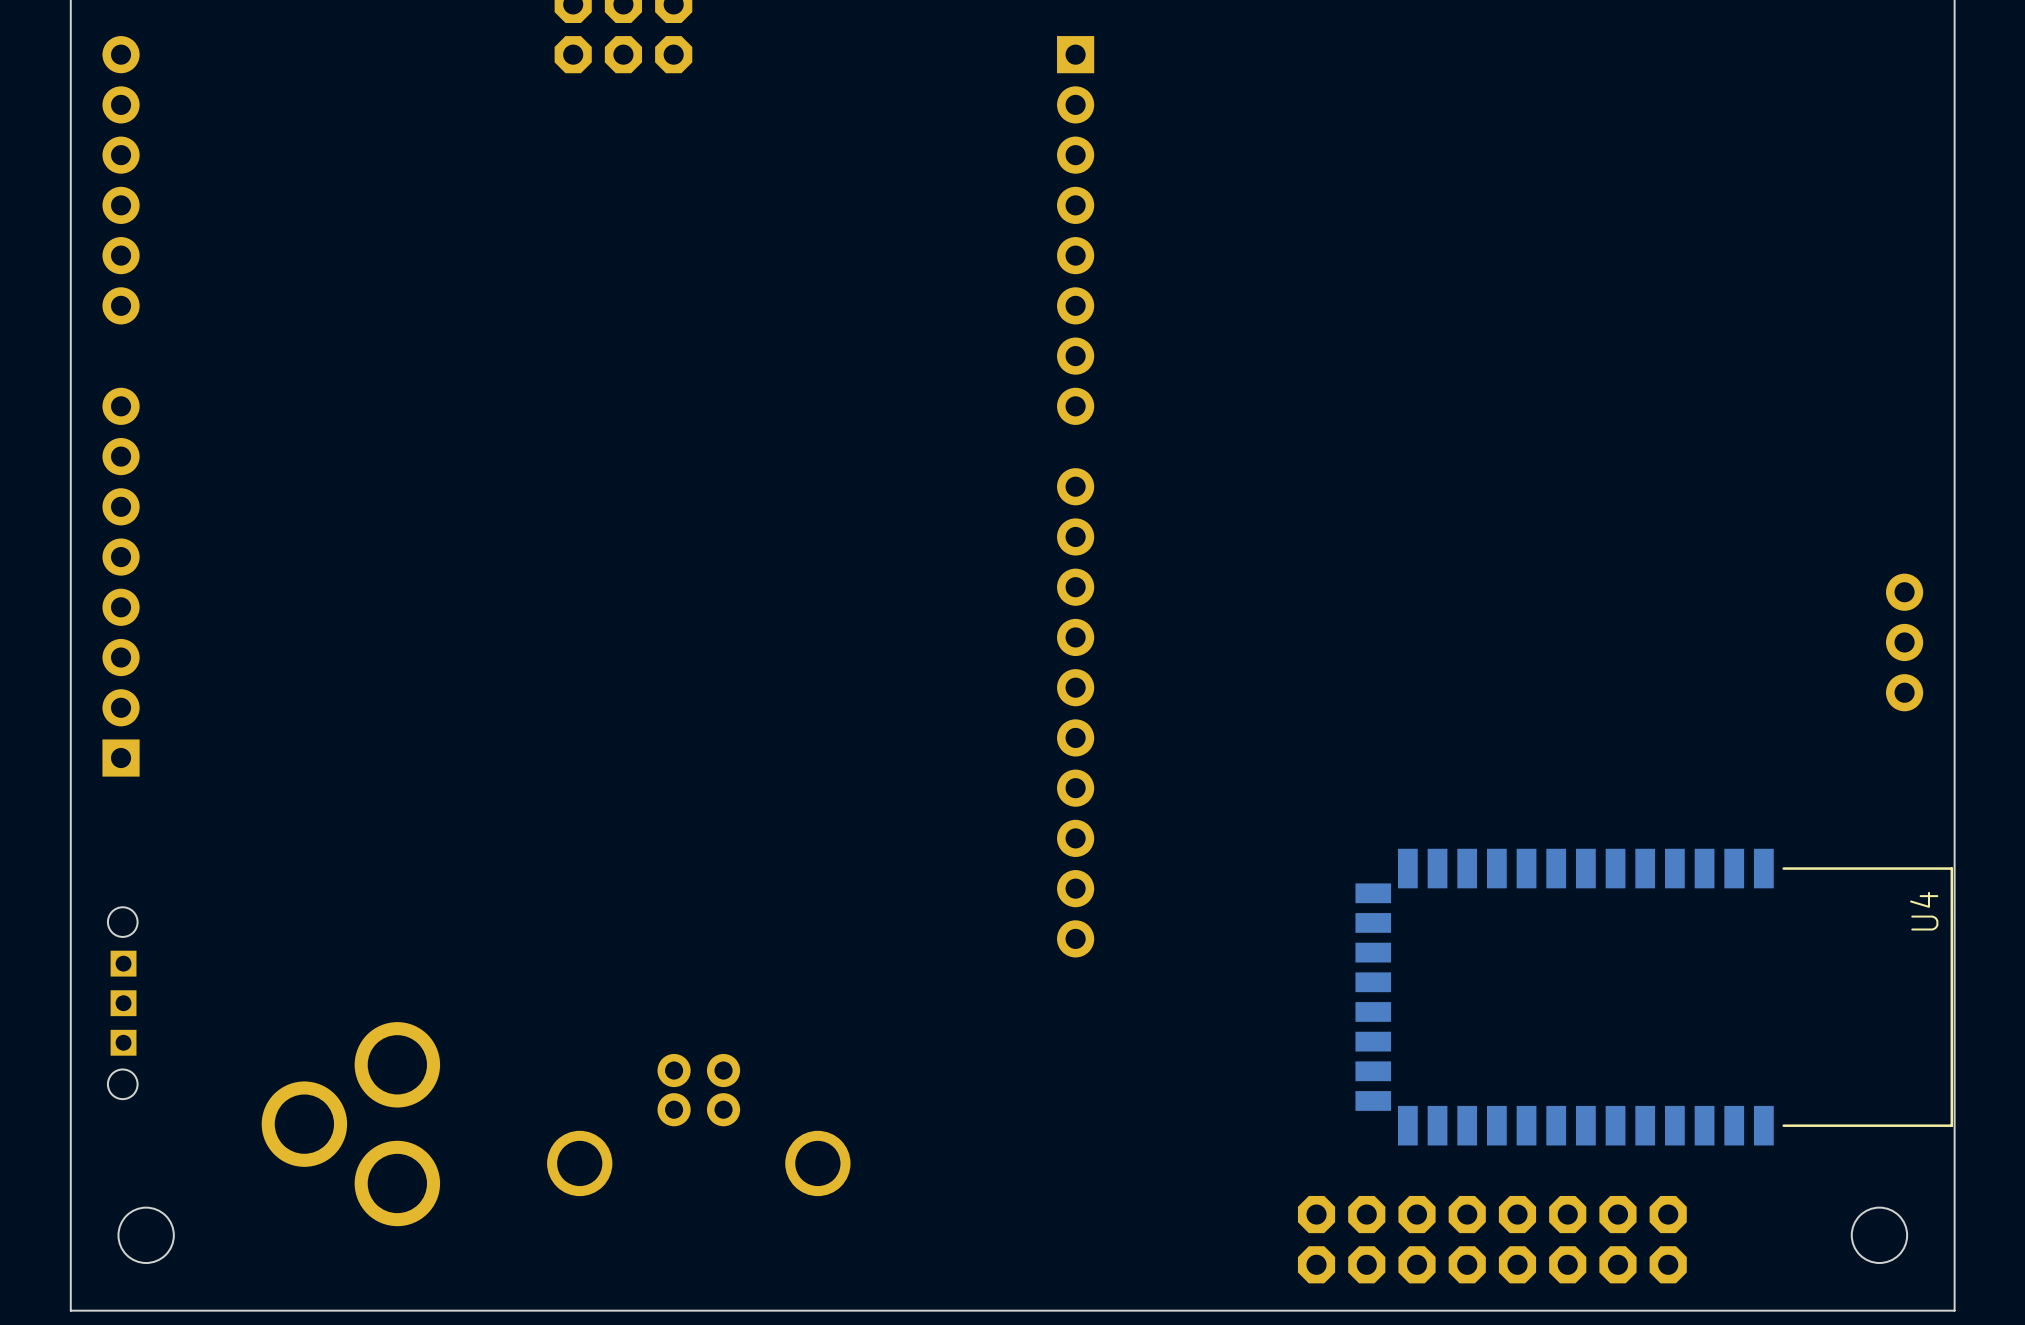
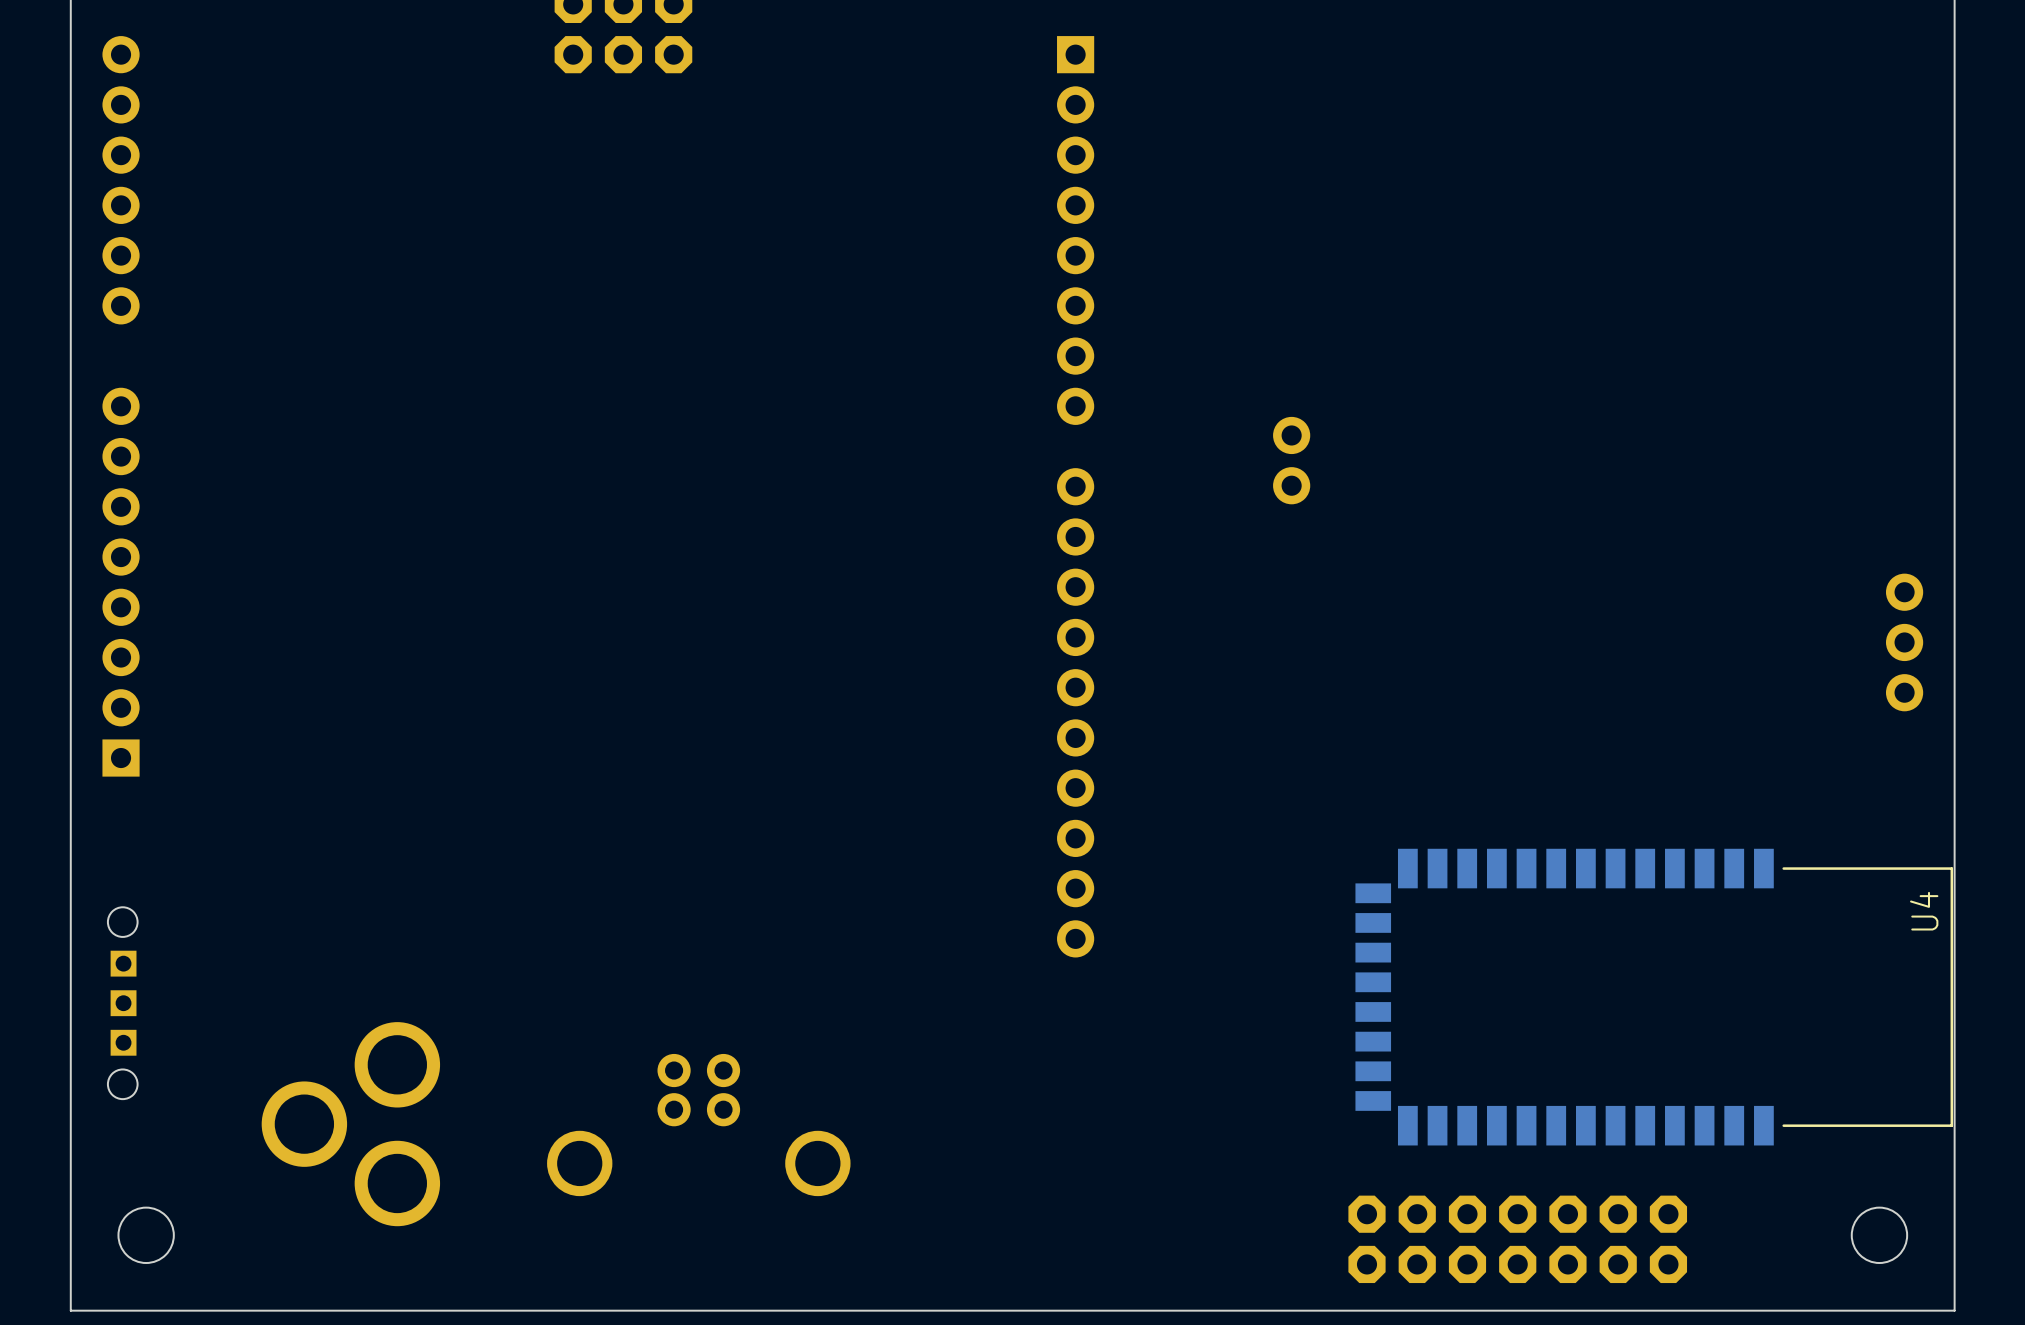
part: none -> (1291, 460)
part: (1492, 1239) -> none
part: none -> (1517, 1239)

